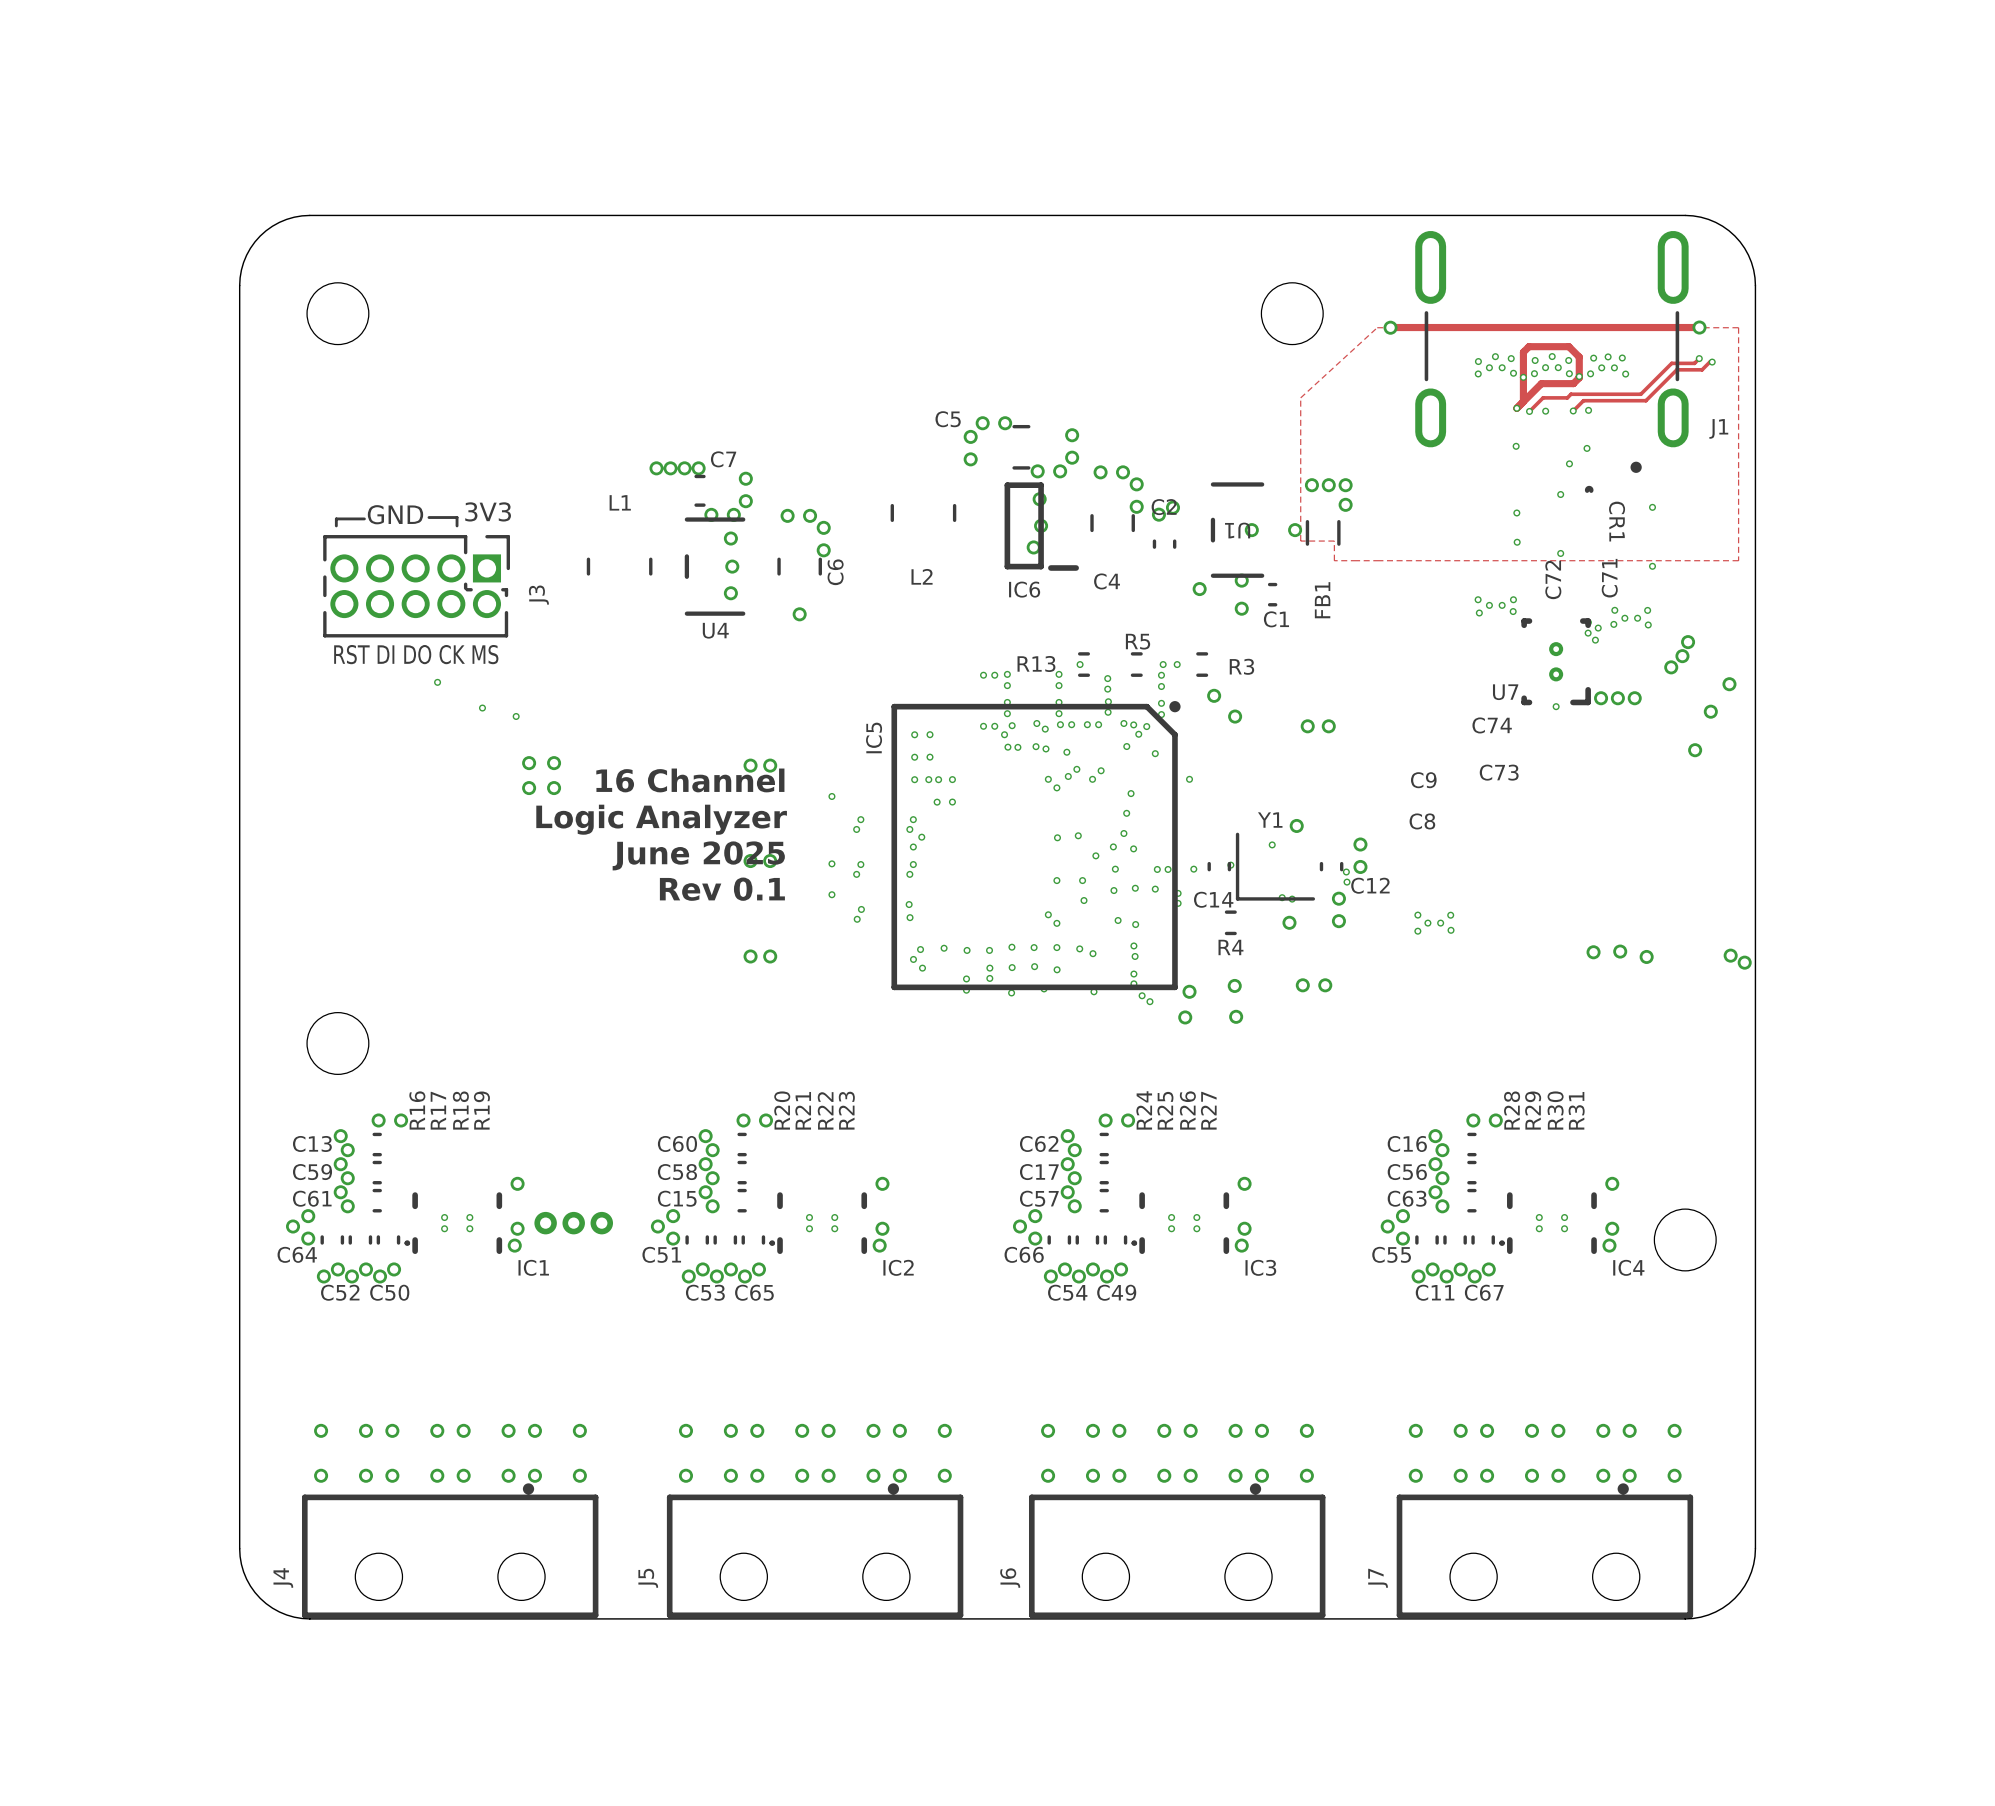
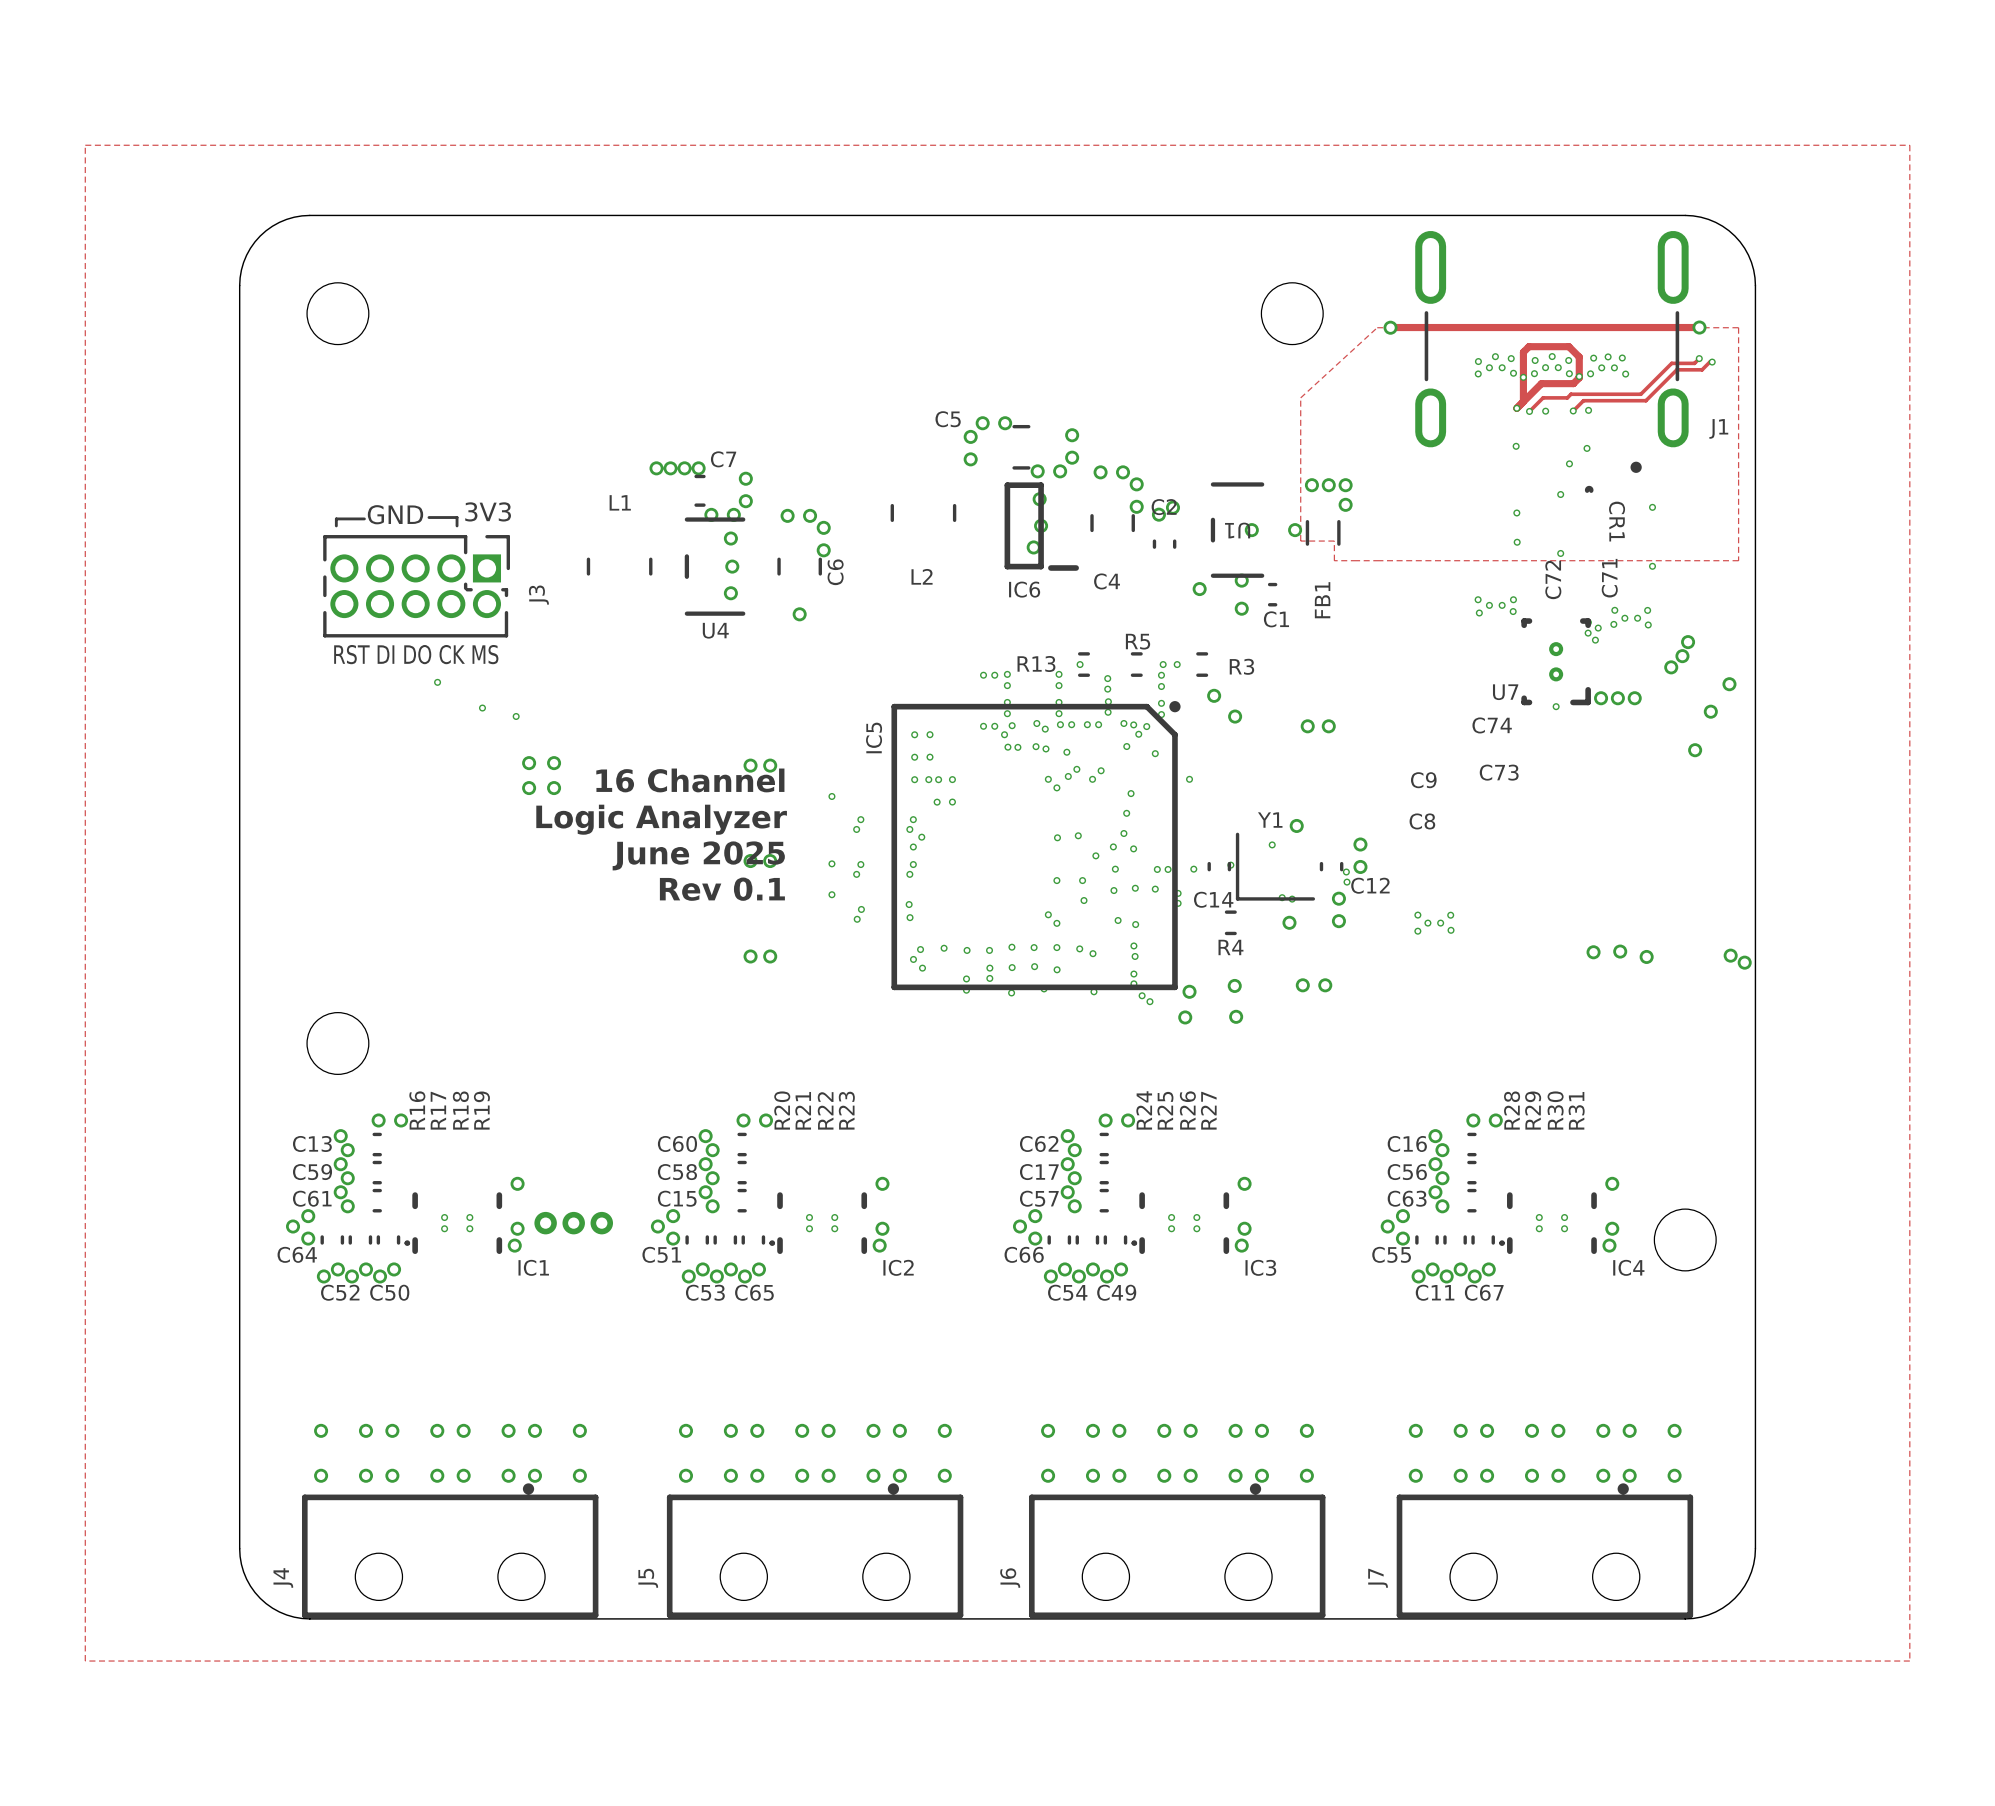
zone outline: none -> (85, 145) (1909, 145) (1909, 1661) (85, 1661) (85, 145)

